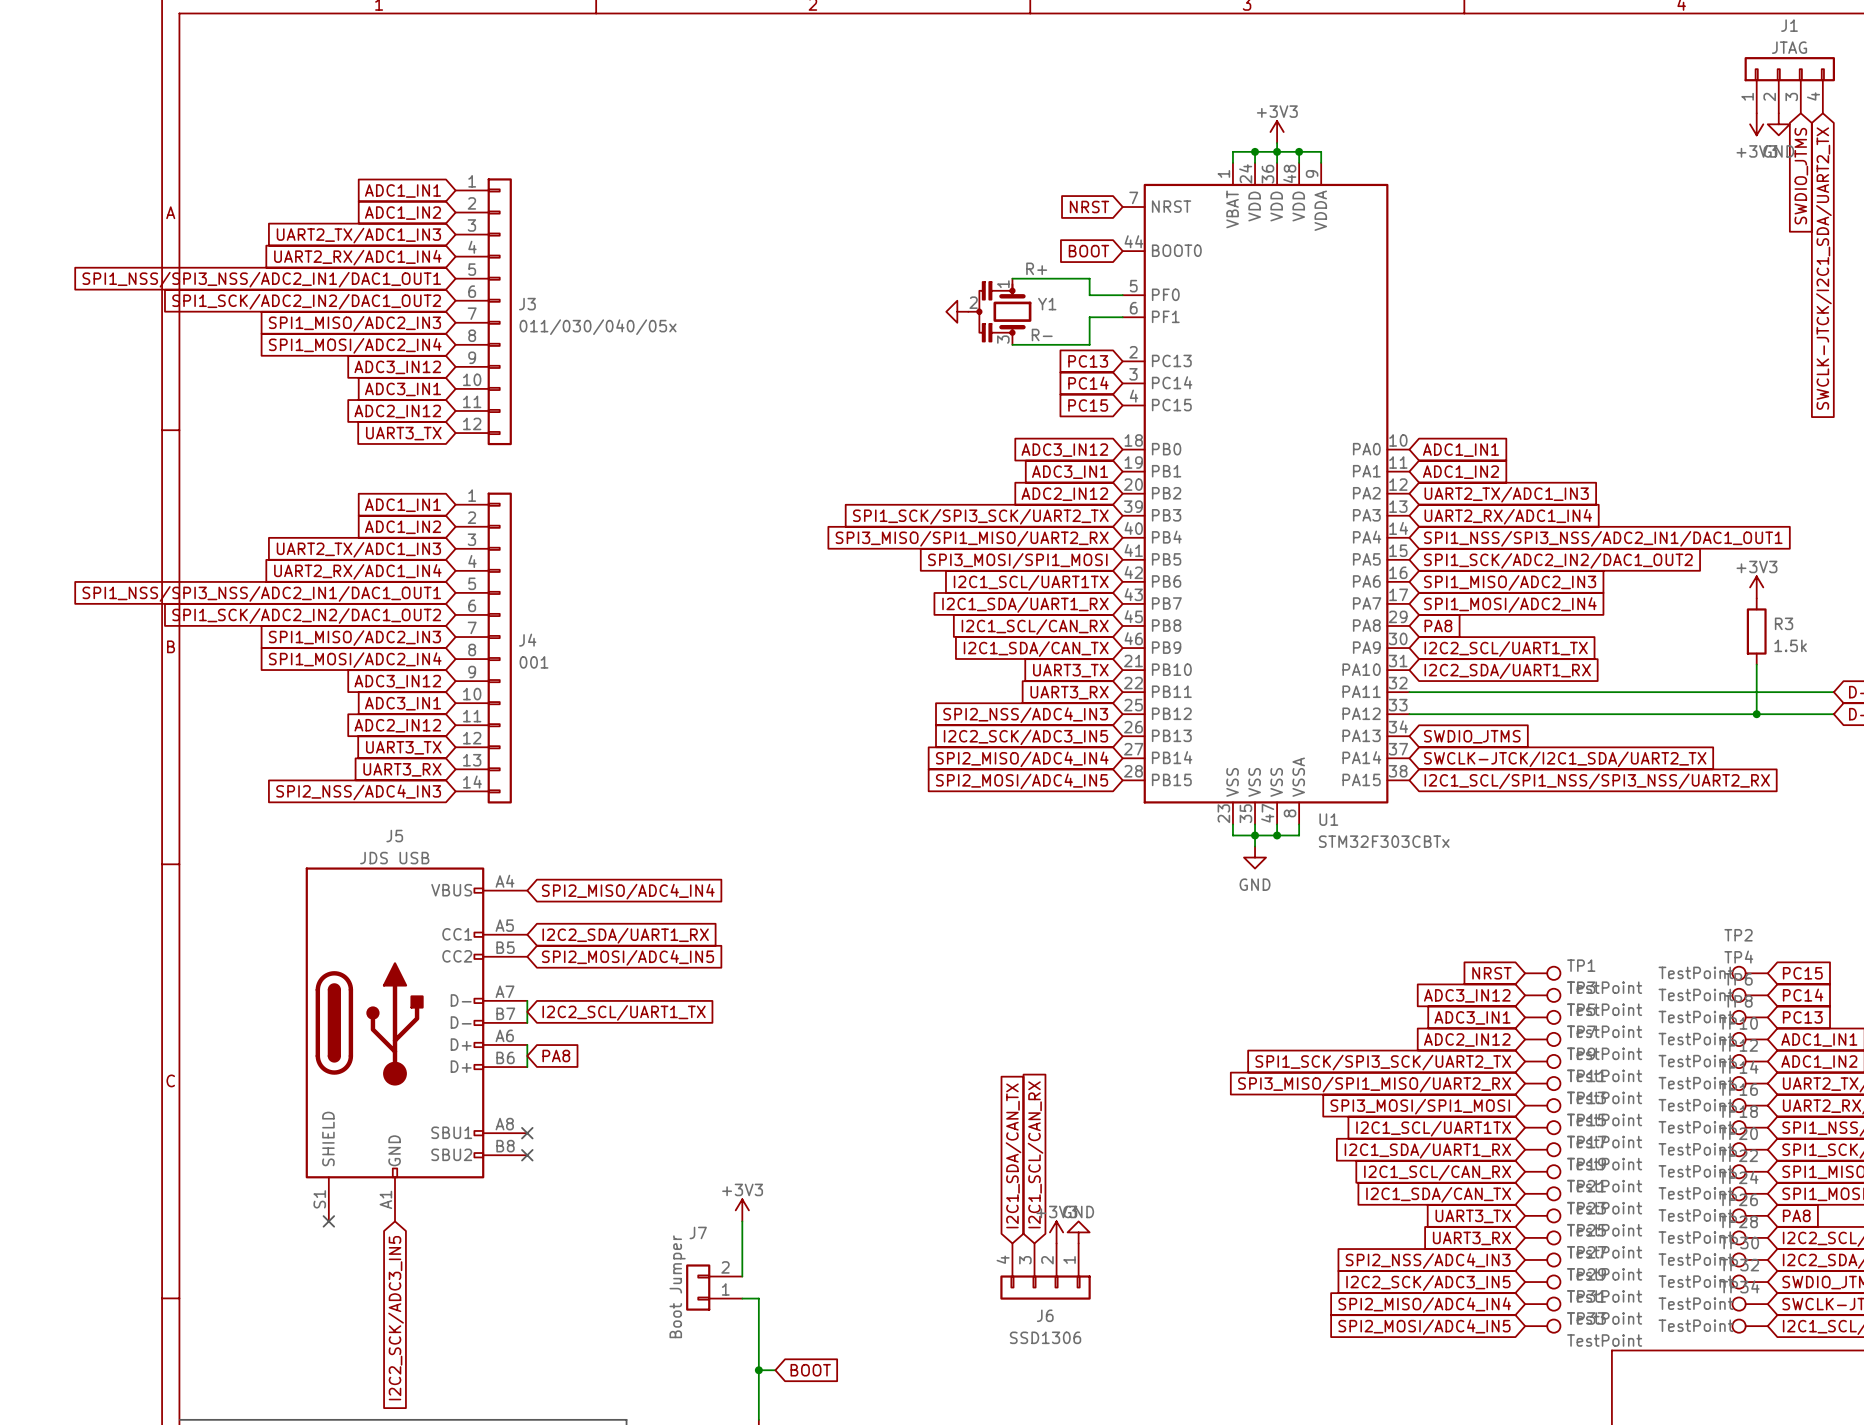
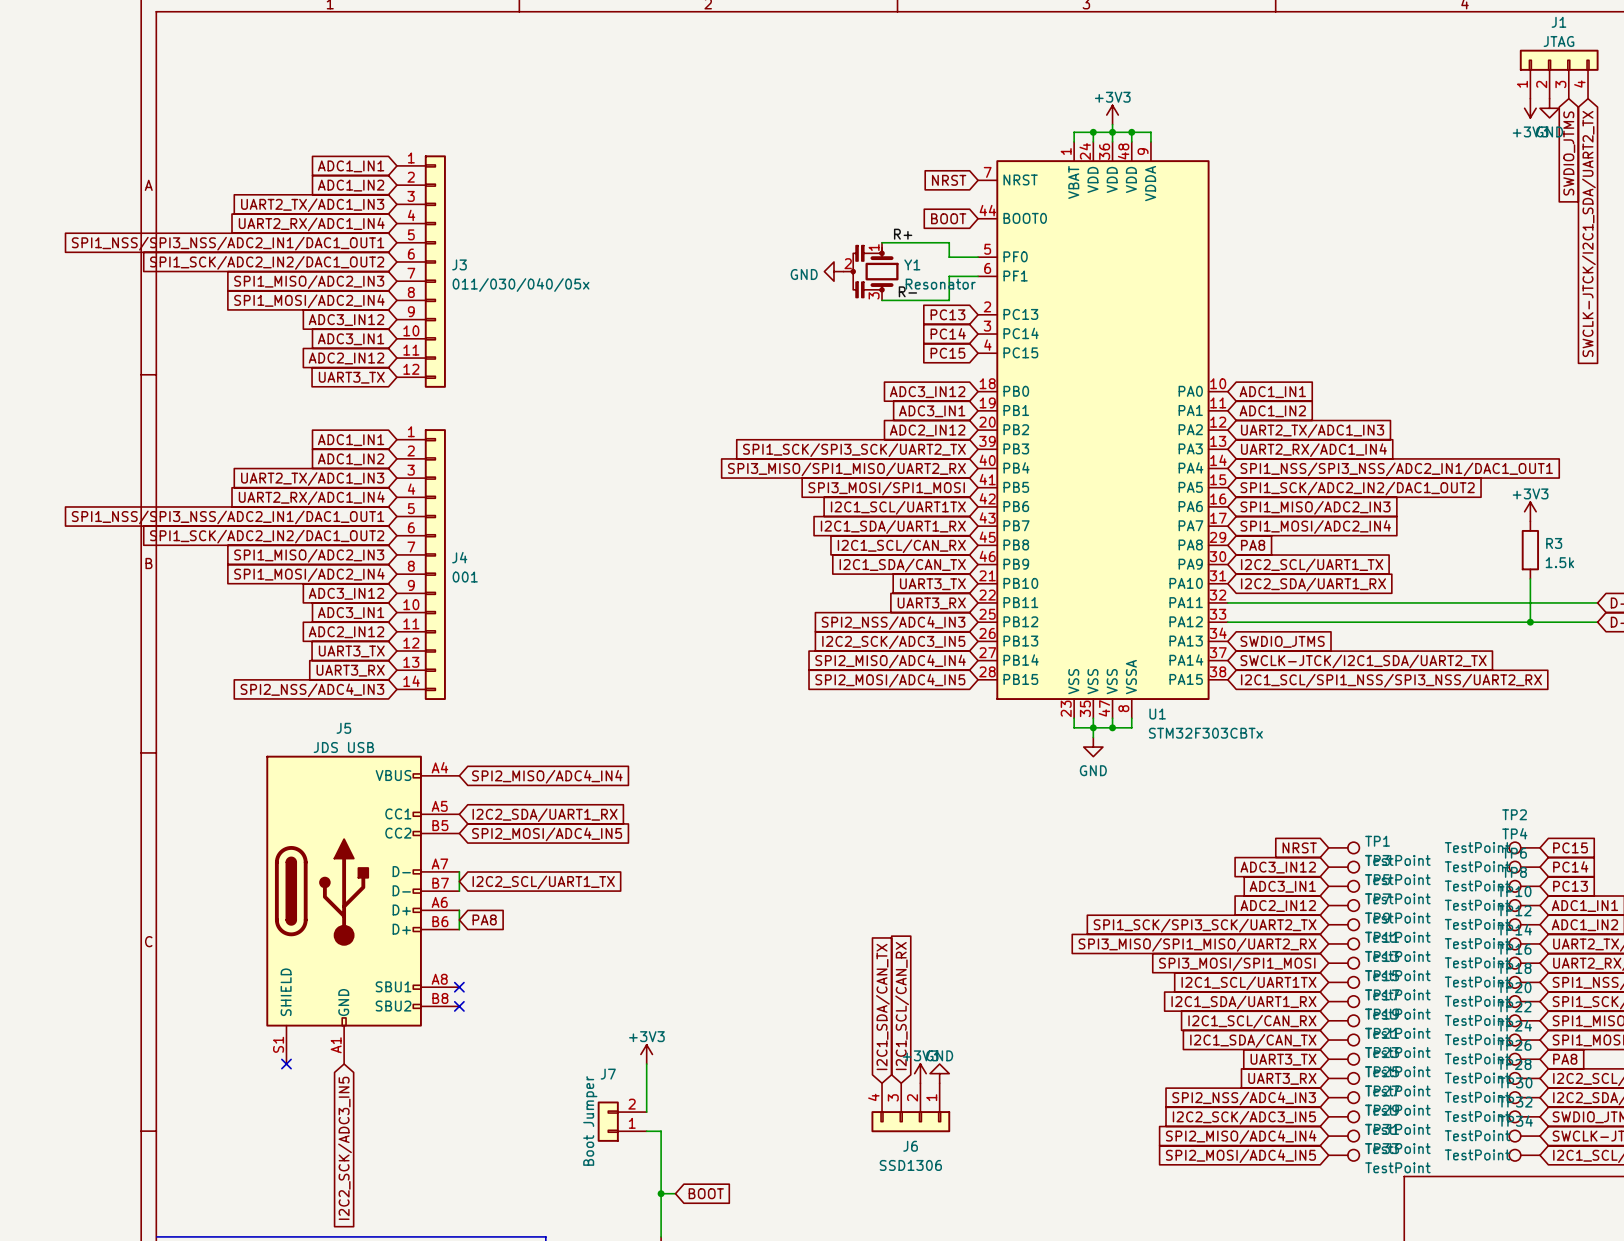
power symbol text: none -> GND (804, 274)
Y1 value: none -> Resonator (940, 284)

